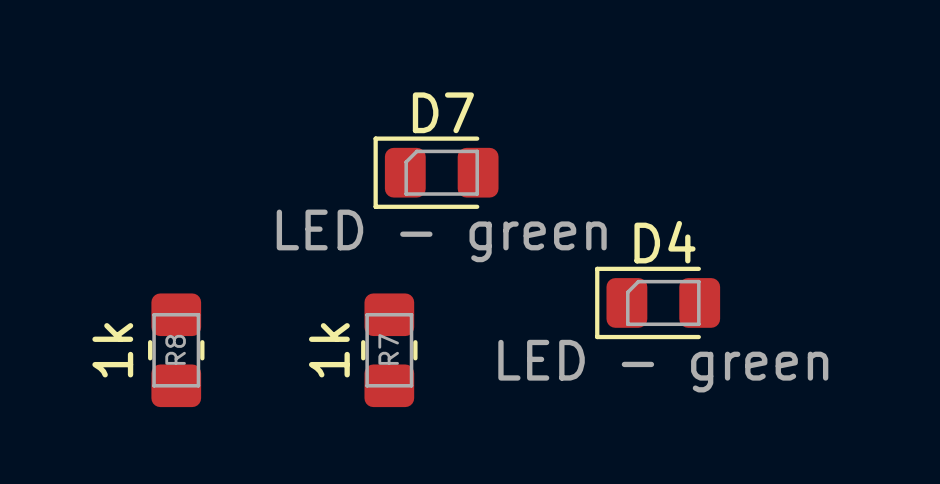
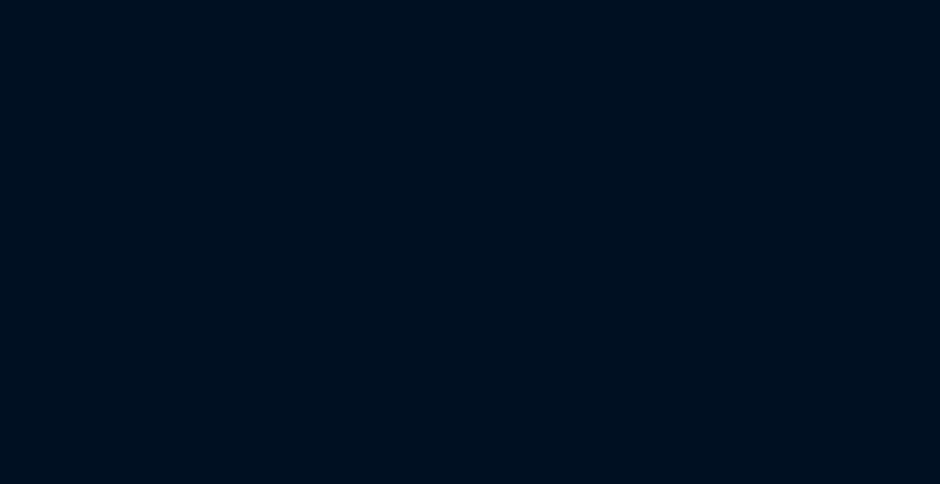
D7: LED - green (436, 172) -> none
D4: LED - green (657, 302) -> none
R8: 1k (176, 350) -> none
R7: 1k (389, 350) -> none

